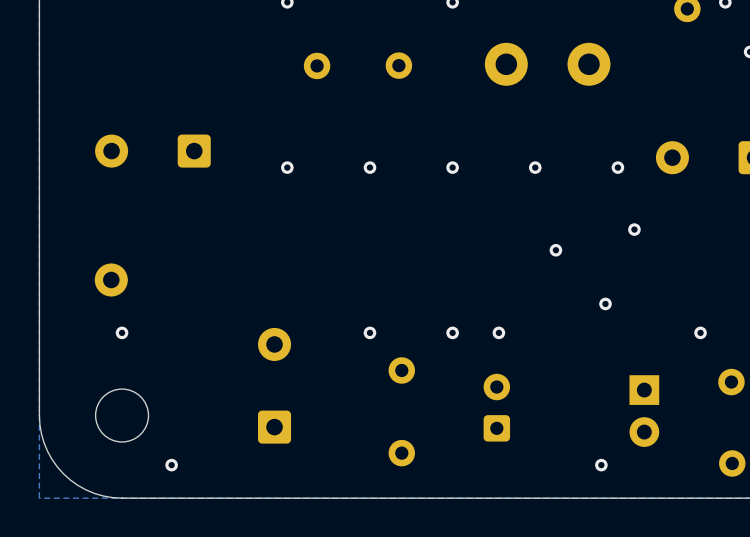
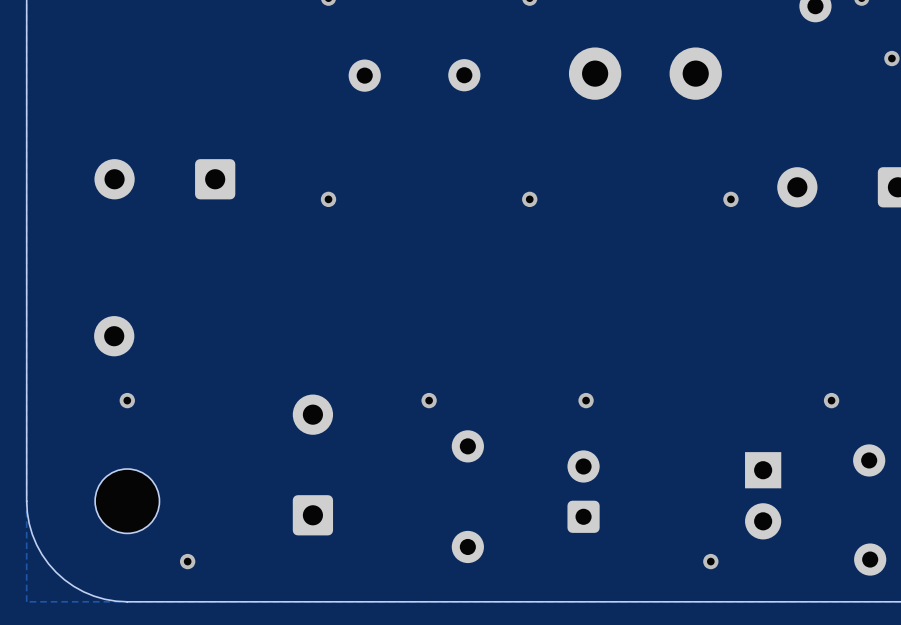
via: (369, 167) -> none
via: (535, 167) -> none
via: (634, 229) -> none
via: (555, 250) -> none
via: (605, 303) -> none
via: (452, 332) -> none

